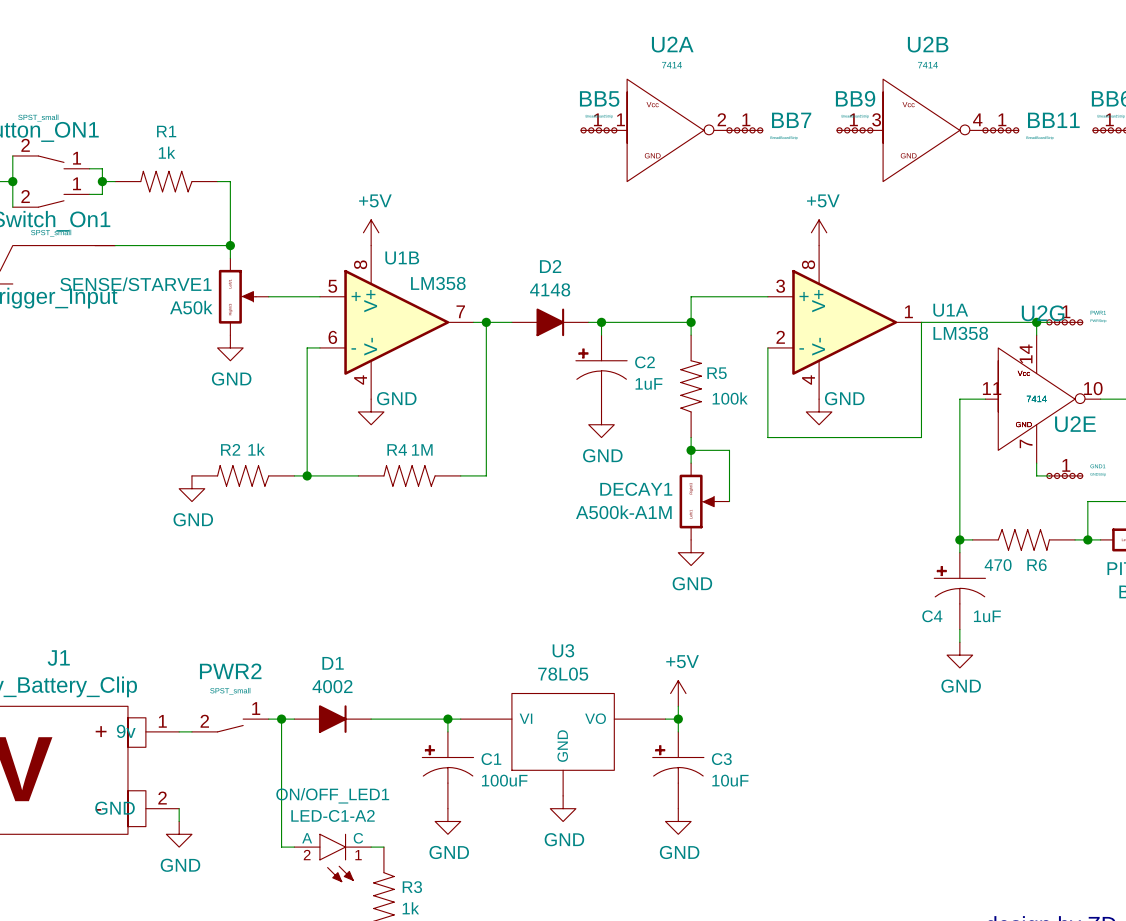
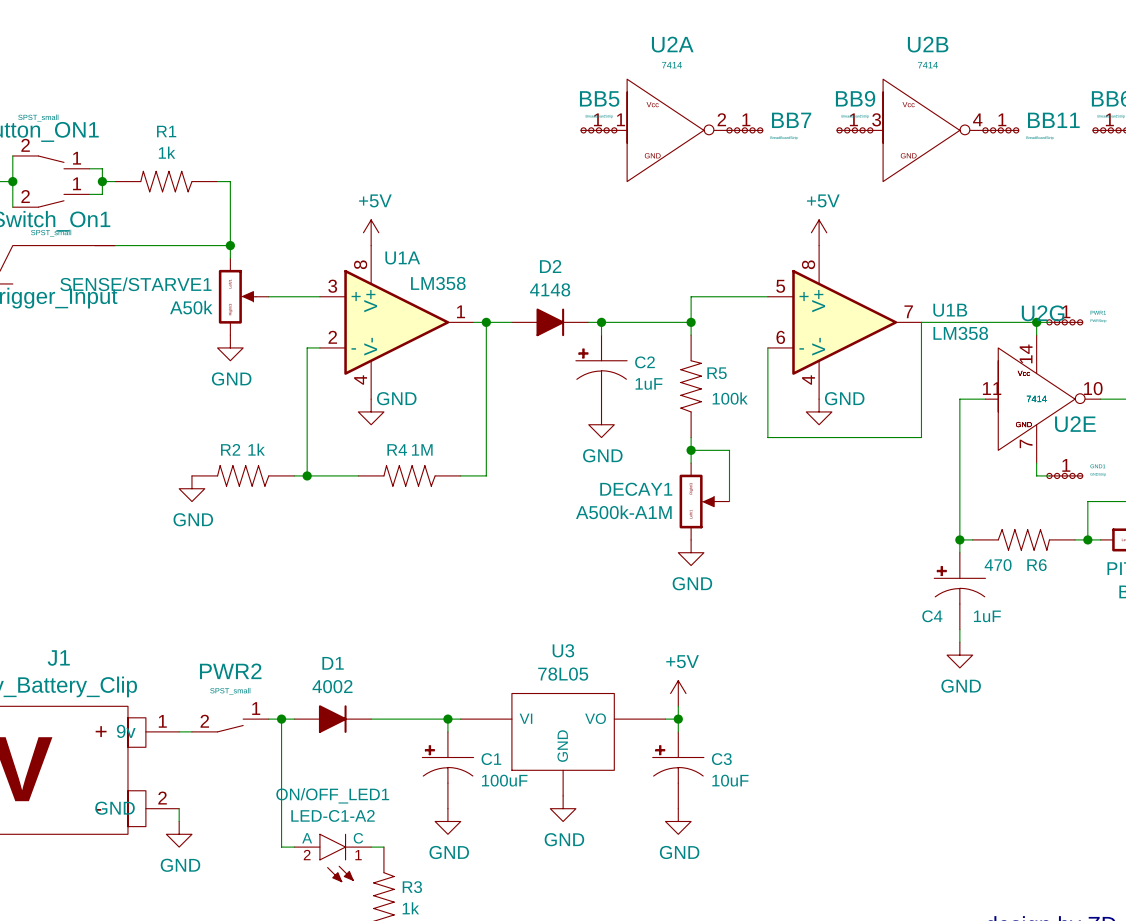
U1B name position: U1B (402, 257) -> U1B (950, 310)
U1A name position: U1A (950, 310) -> U1A (402, 257)
U1B position: (396, 322) -> (844, 322)
U1A position: (844, 322) -> (396, 322)

